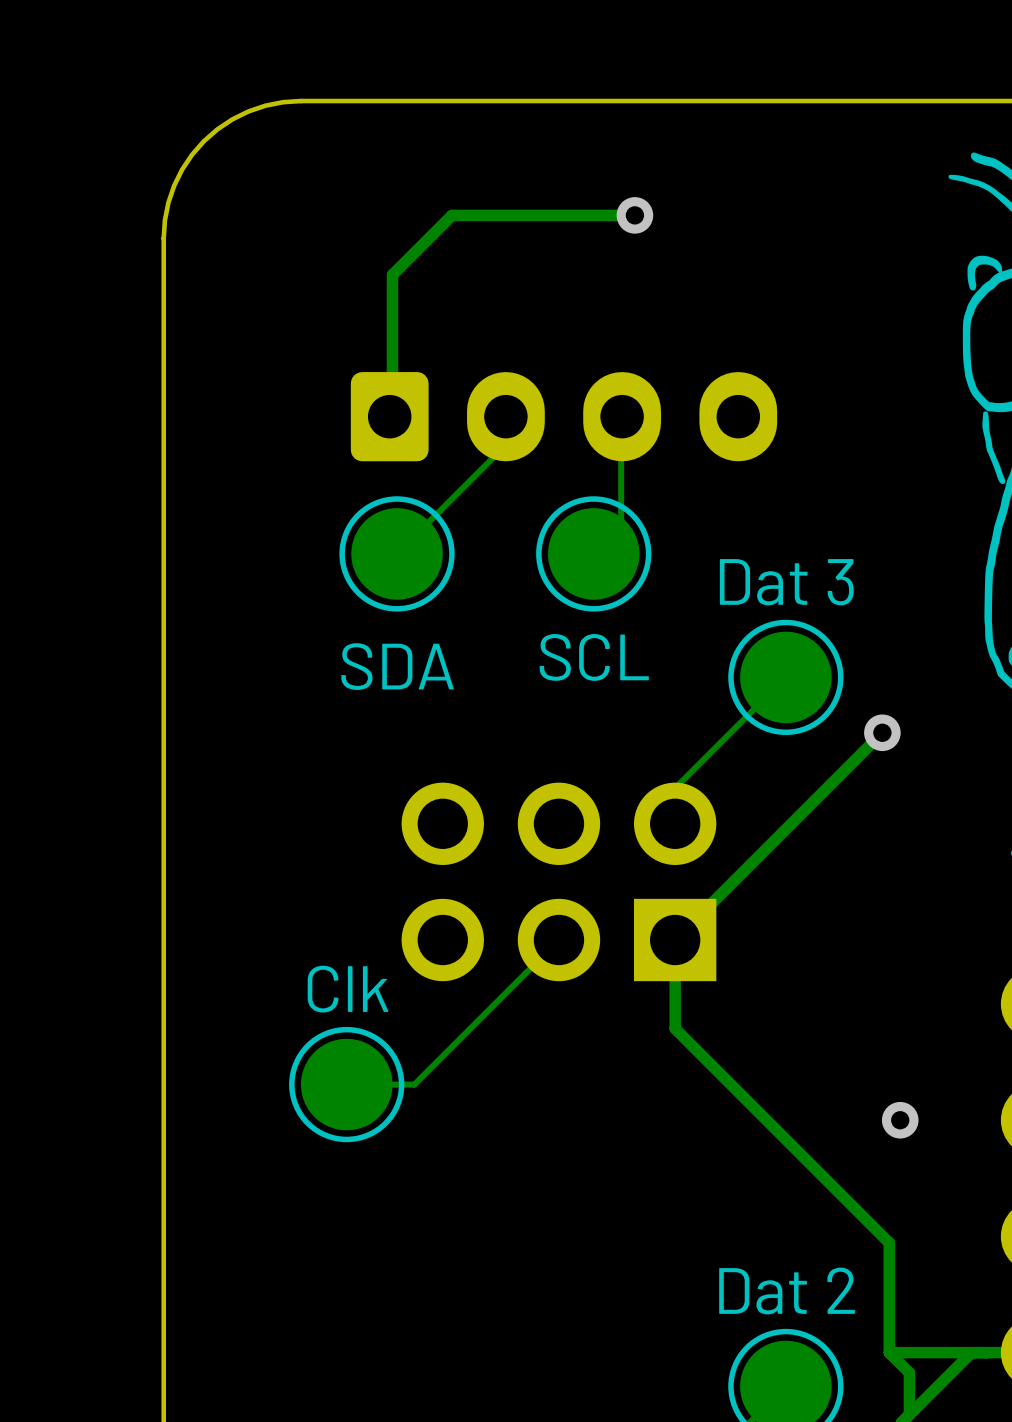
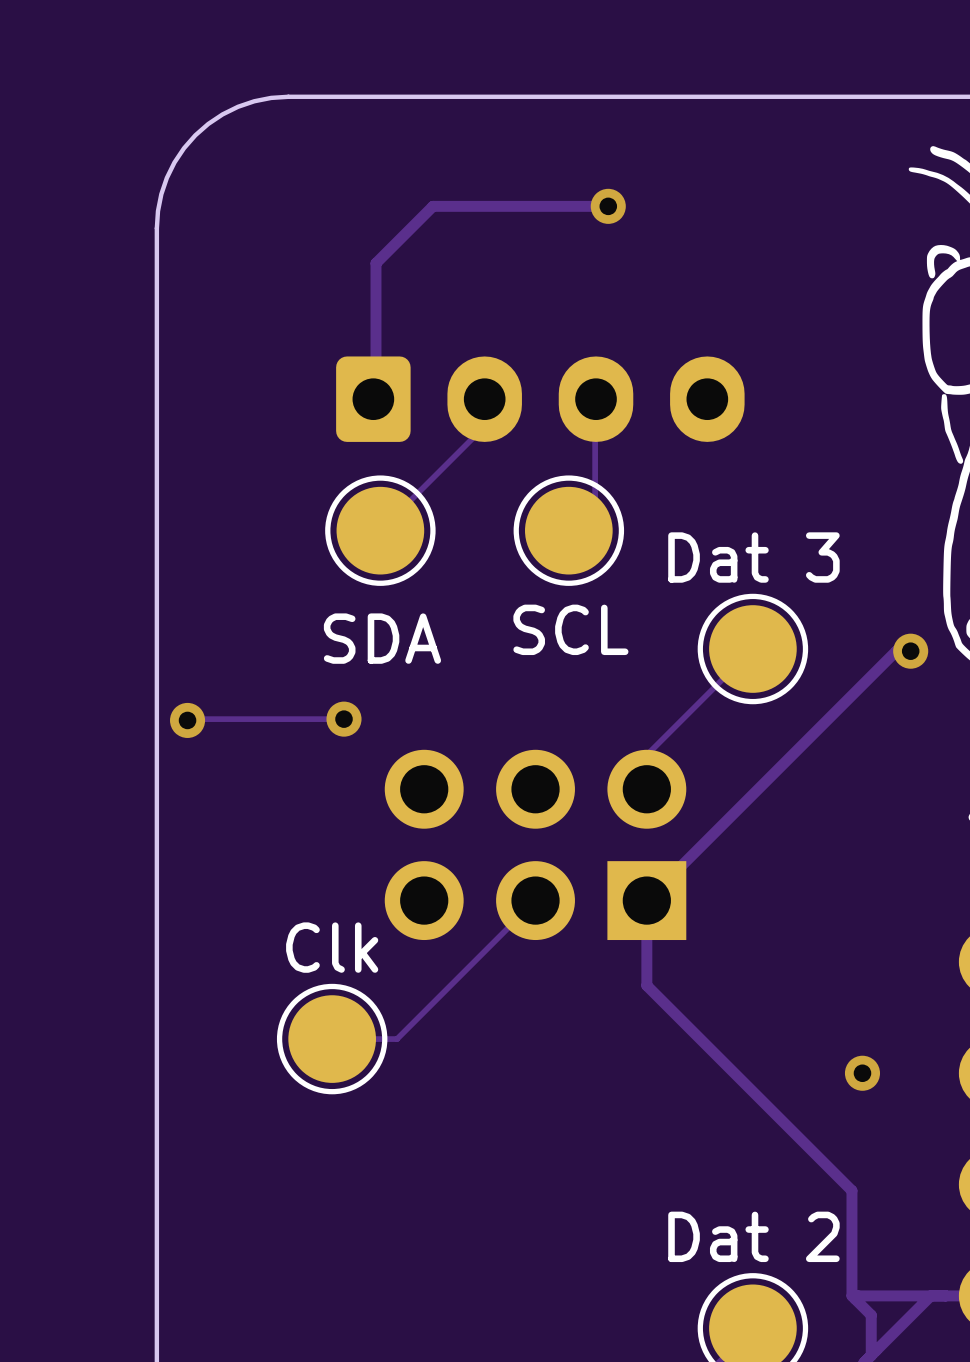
track: none -> (910, 651) (896, 651) (845, 702)
via position: (882, 732) -> (910, 651)
track: none -> (344, 719) (187, 720)
via: none -> (344, 719)
via: none -> (187, 720)

